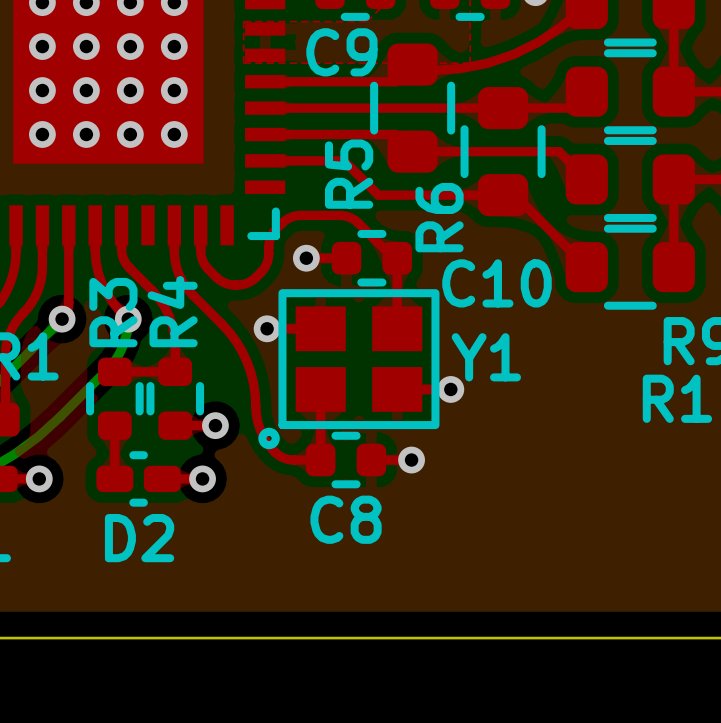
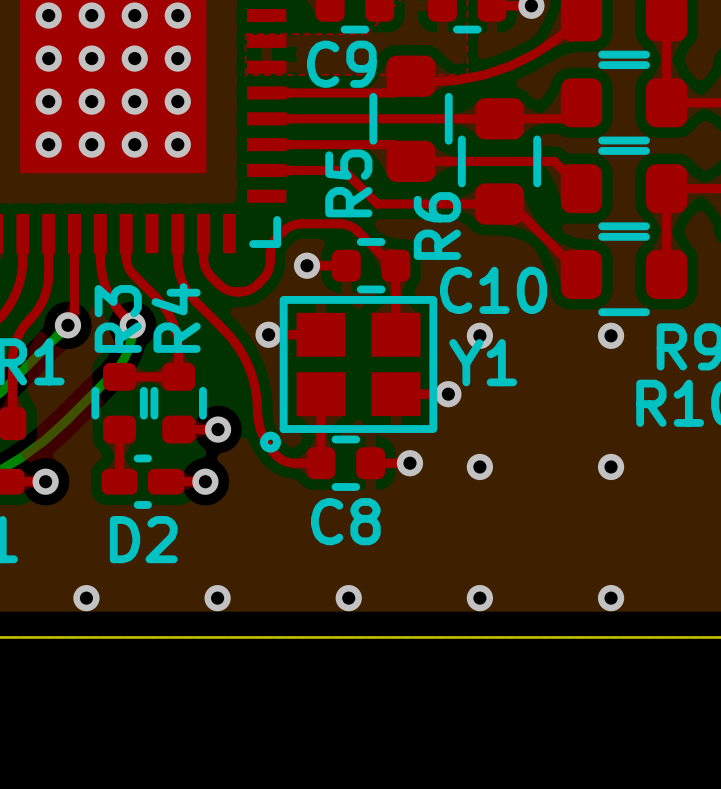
via: none -> (479, 335)
via: none -> (611, 335)
via: none -> (479, 466)
via: none -> (611, 466)
via: none -> (86, 598)
via: none -> (217, 598)
via: none -> (348, 598)
via: none -> (479, 598)
via: none -> (611, 598)

